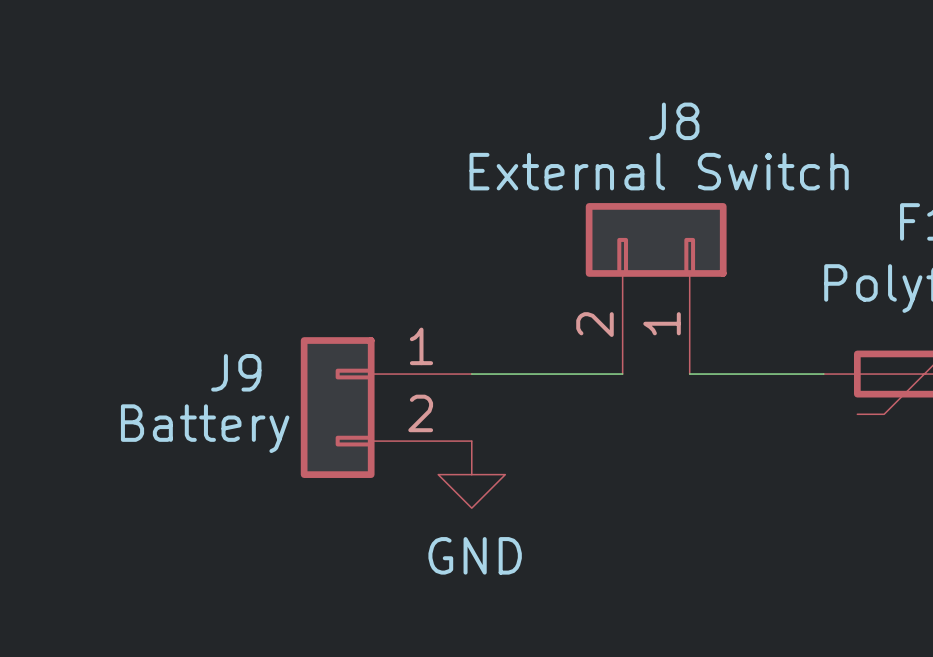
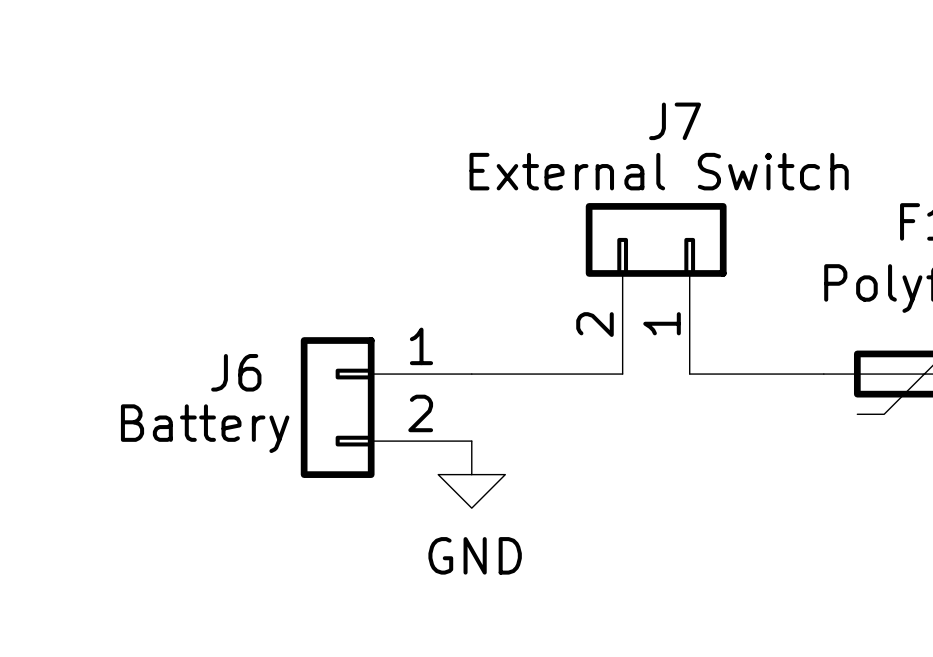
J8 name: J8 (674, 121) -> J7 (675, 121)
J9 name: J9 (236, 372) -> J6 (236, 372)

